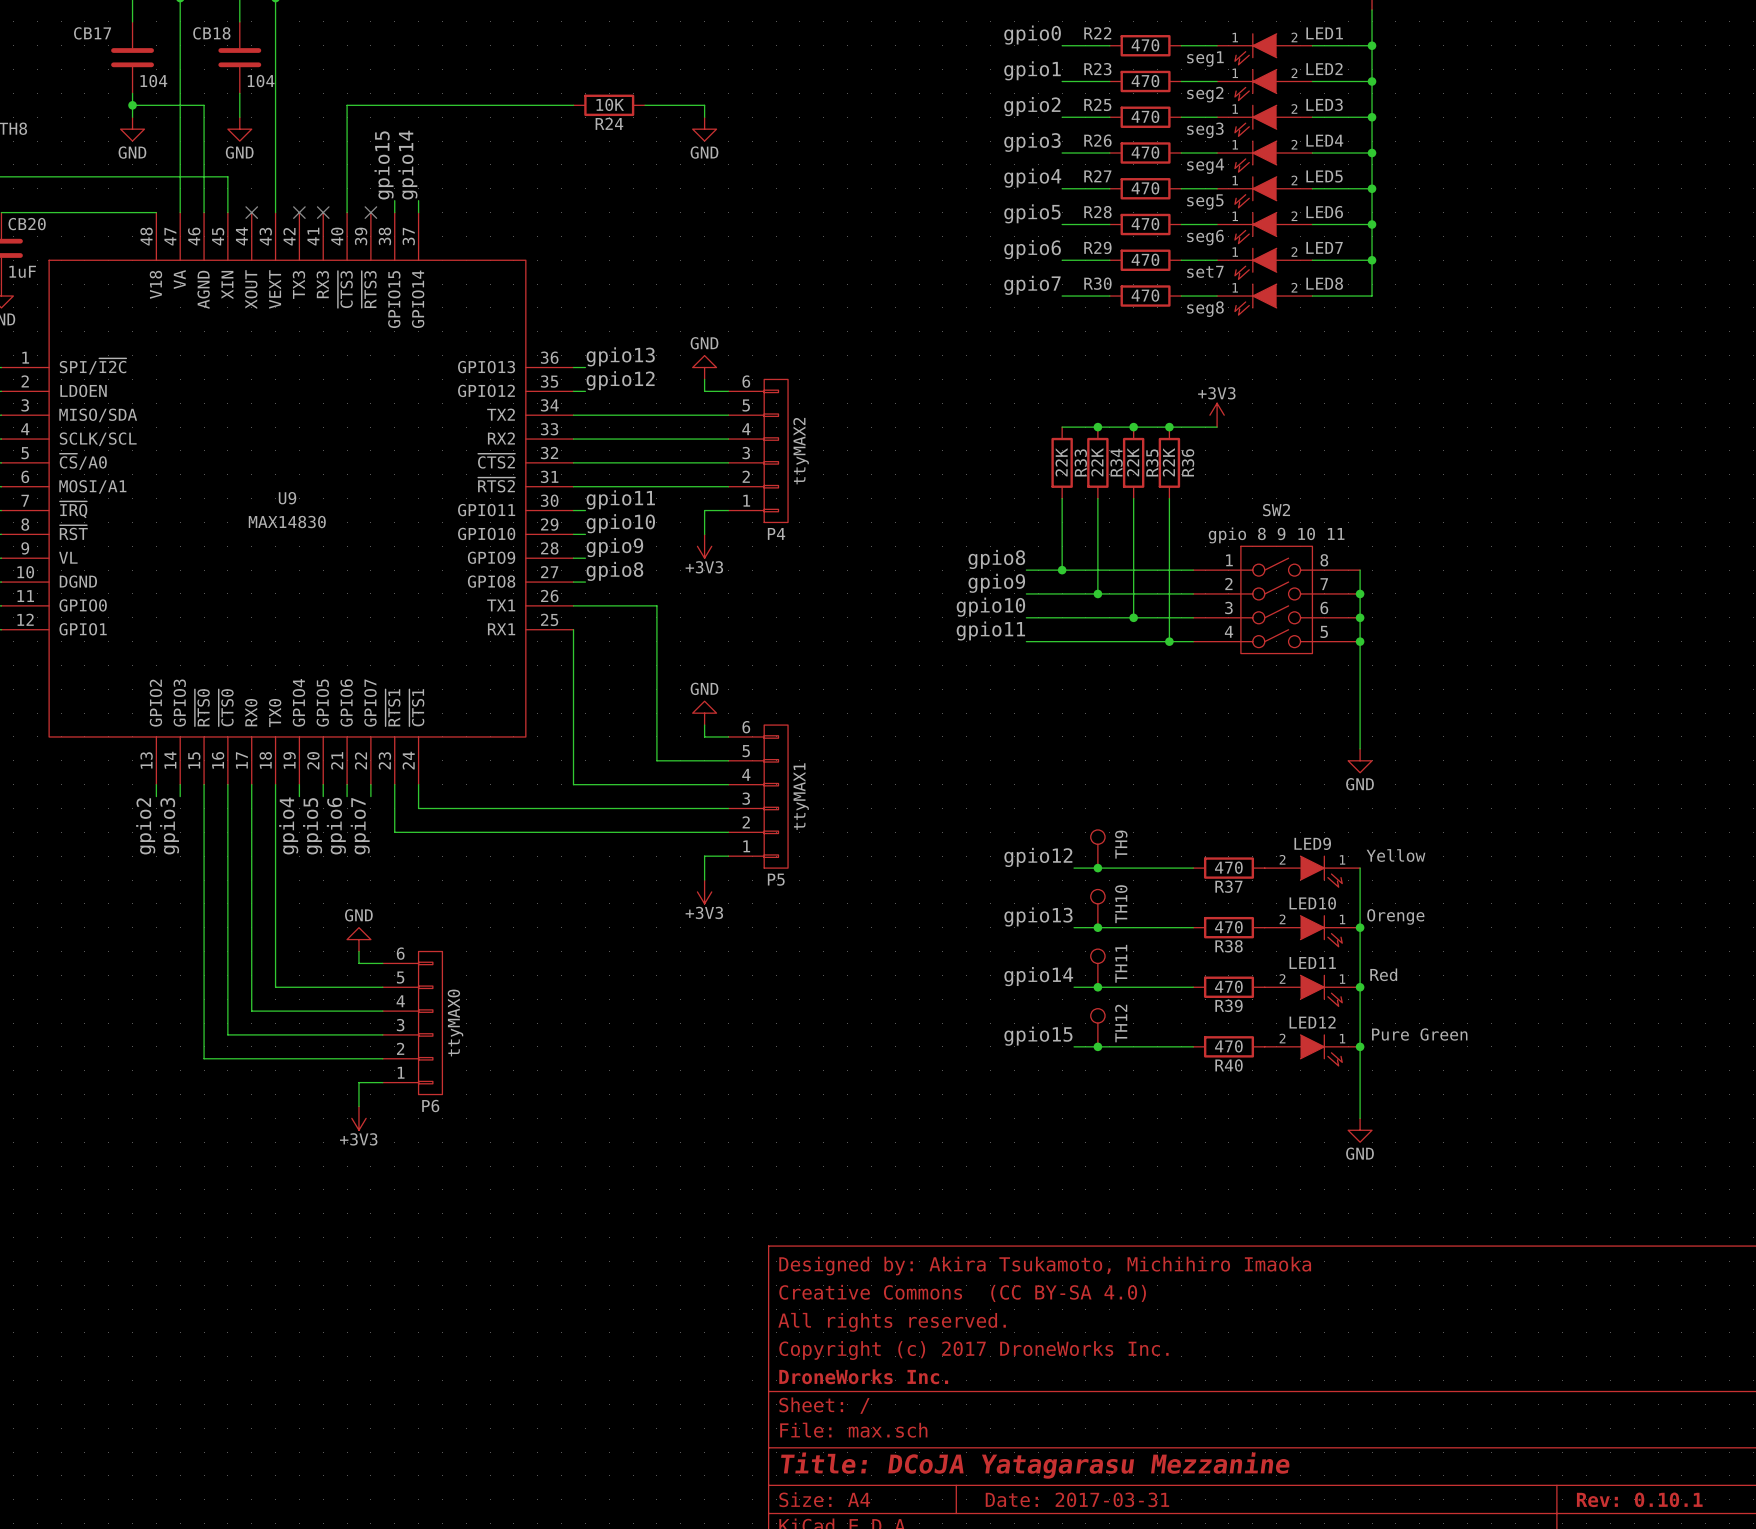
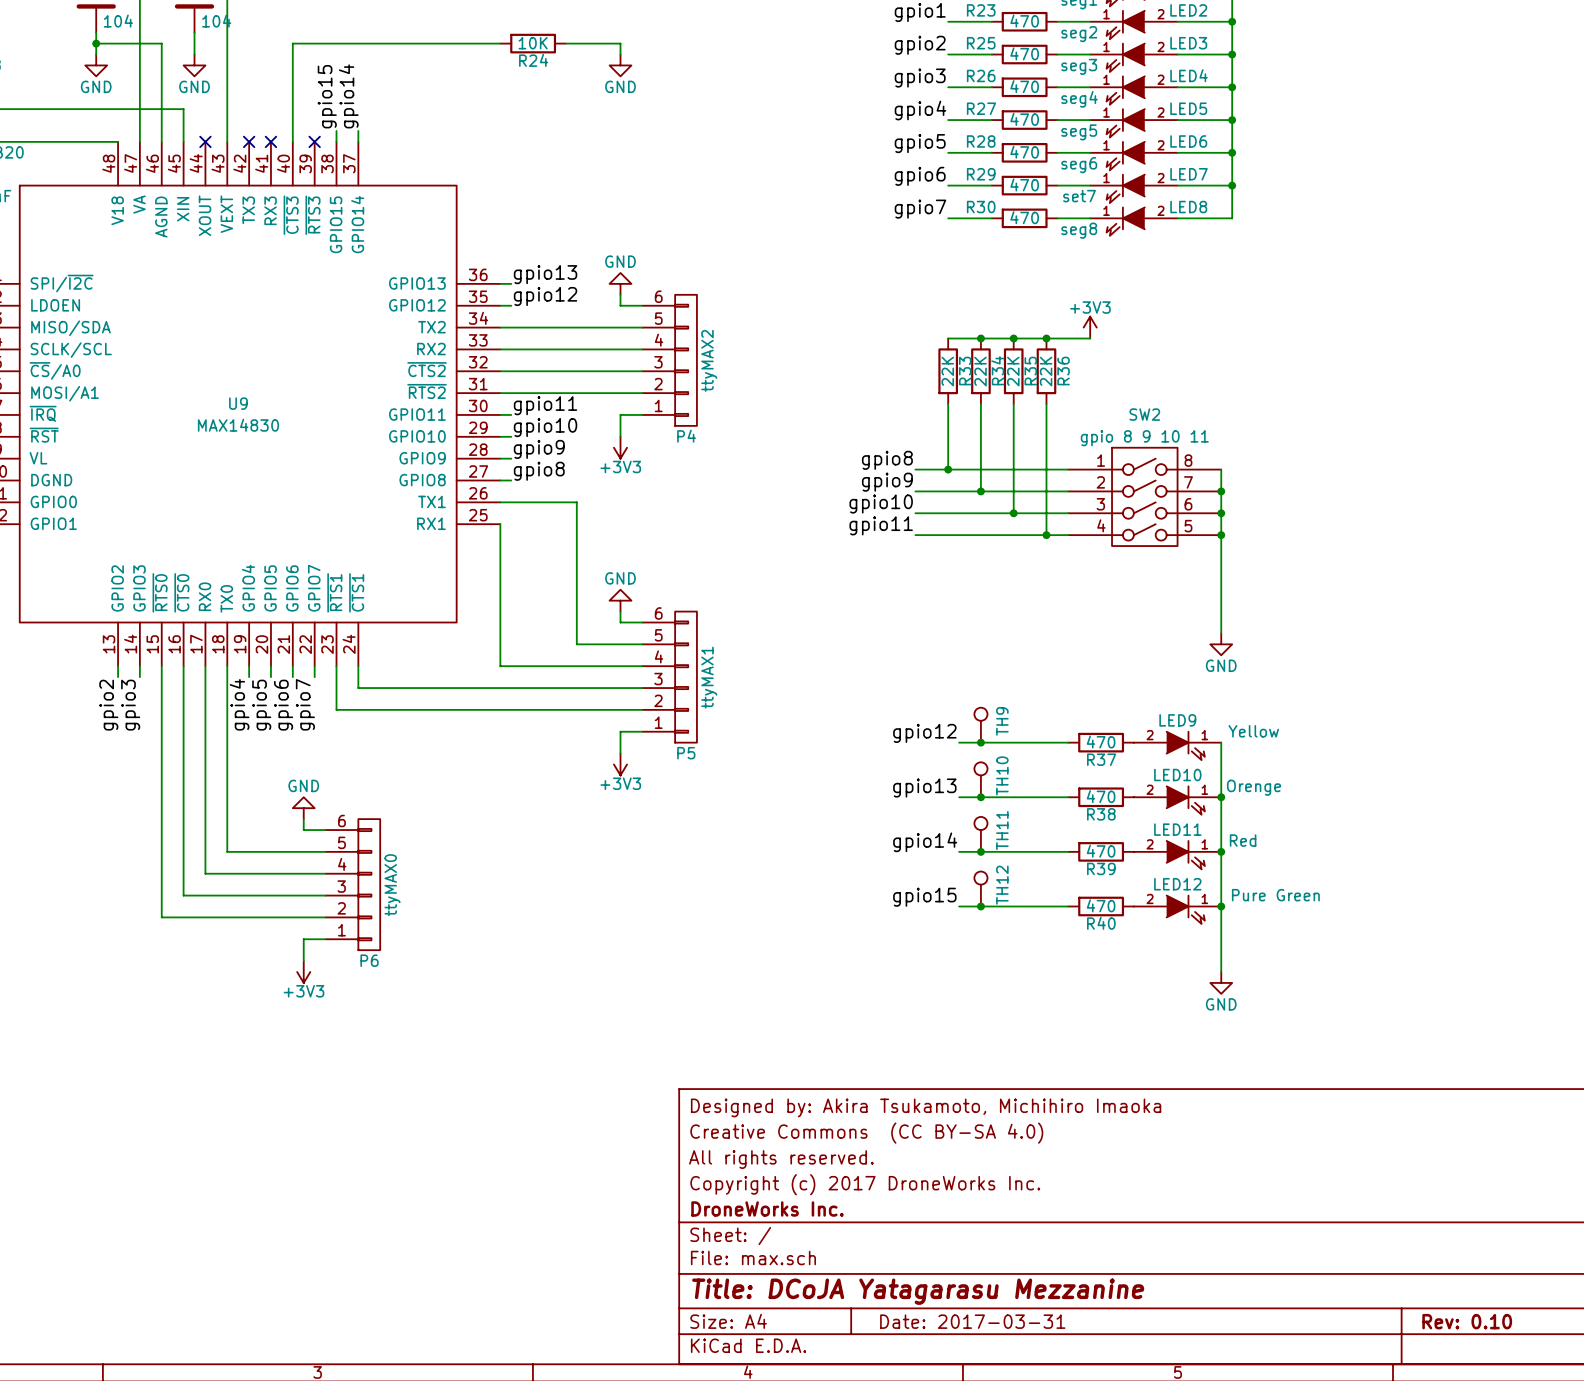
title block: Rev: 0.10.1 (1639, 1499) -> Rev: 0.10 (1467, 1321)

